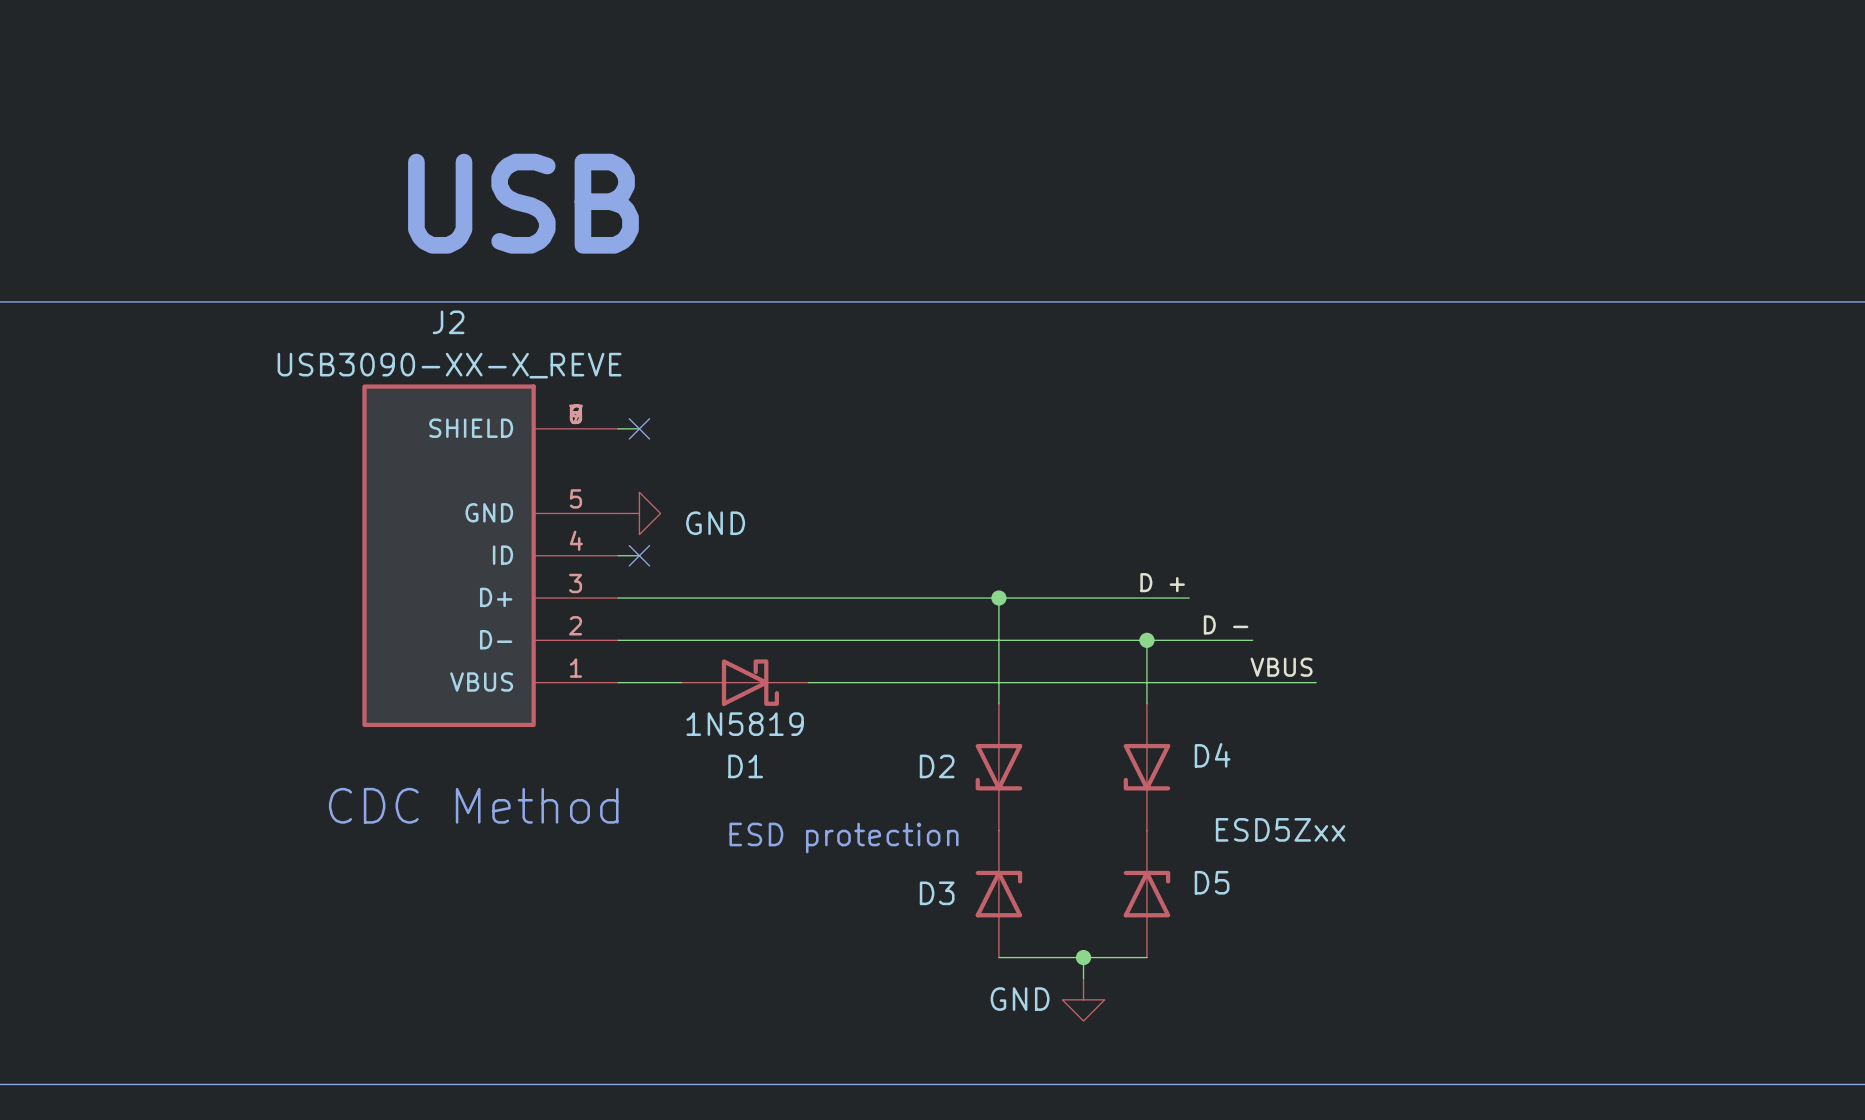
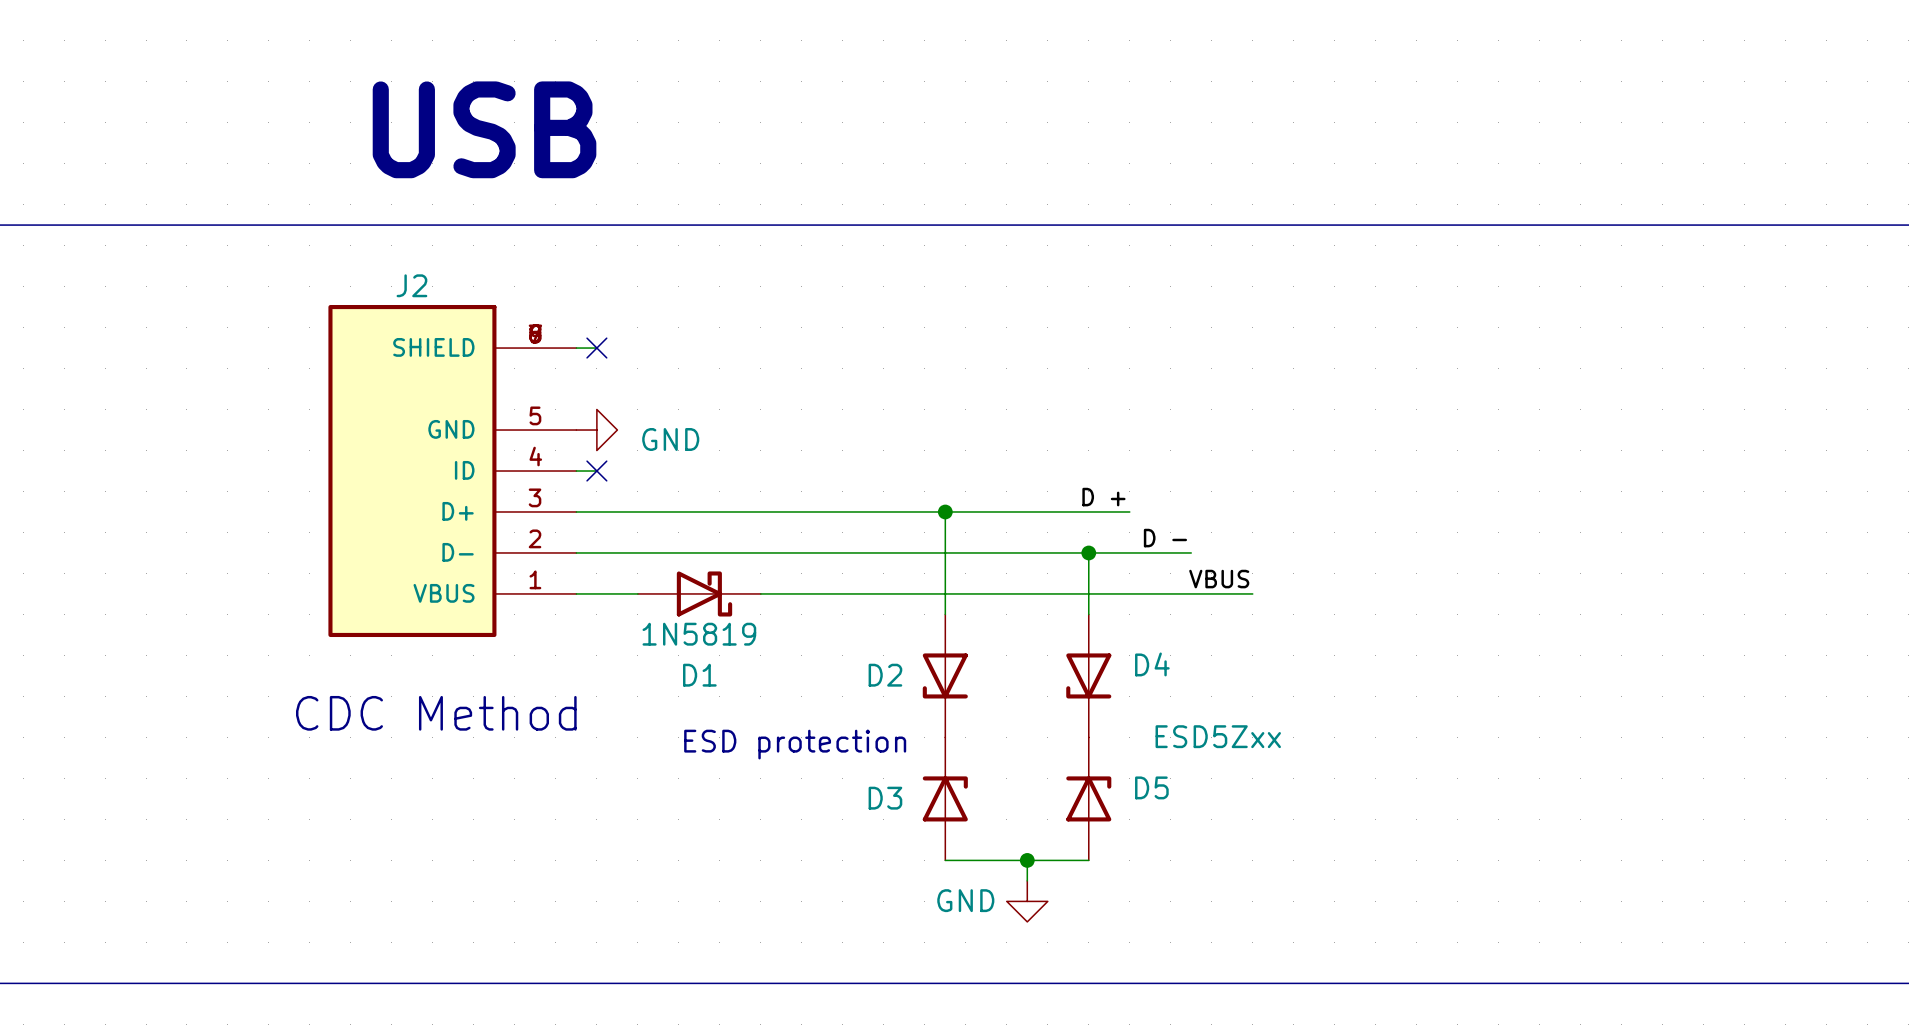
J2 name position: J2 (448, 322) -> J2 (411, 285)
J2 value: USB3090-XX-X_REVE (449, 365) -> none

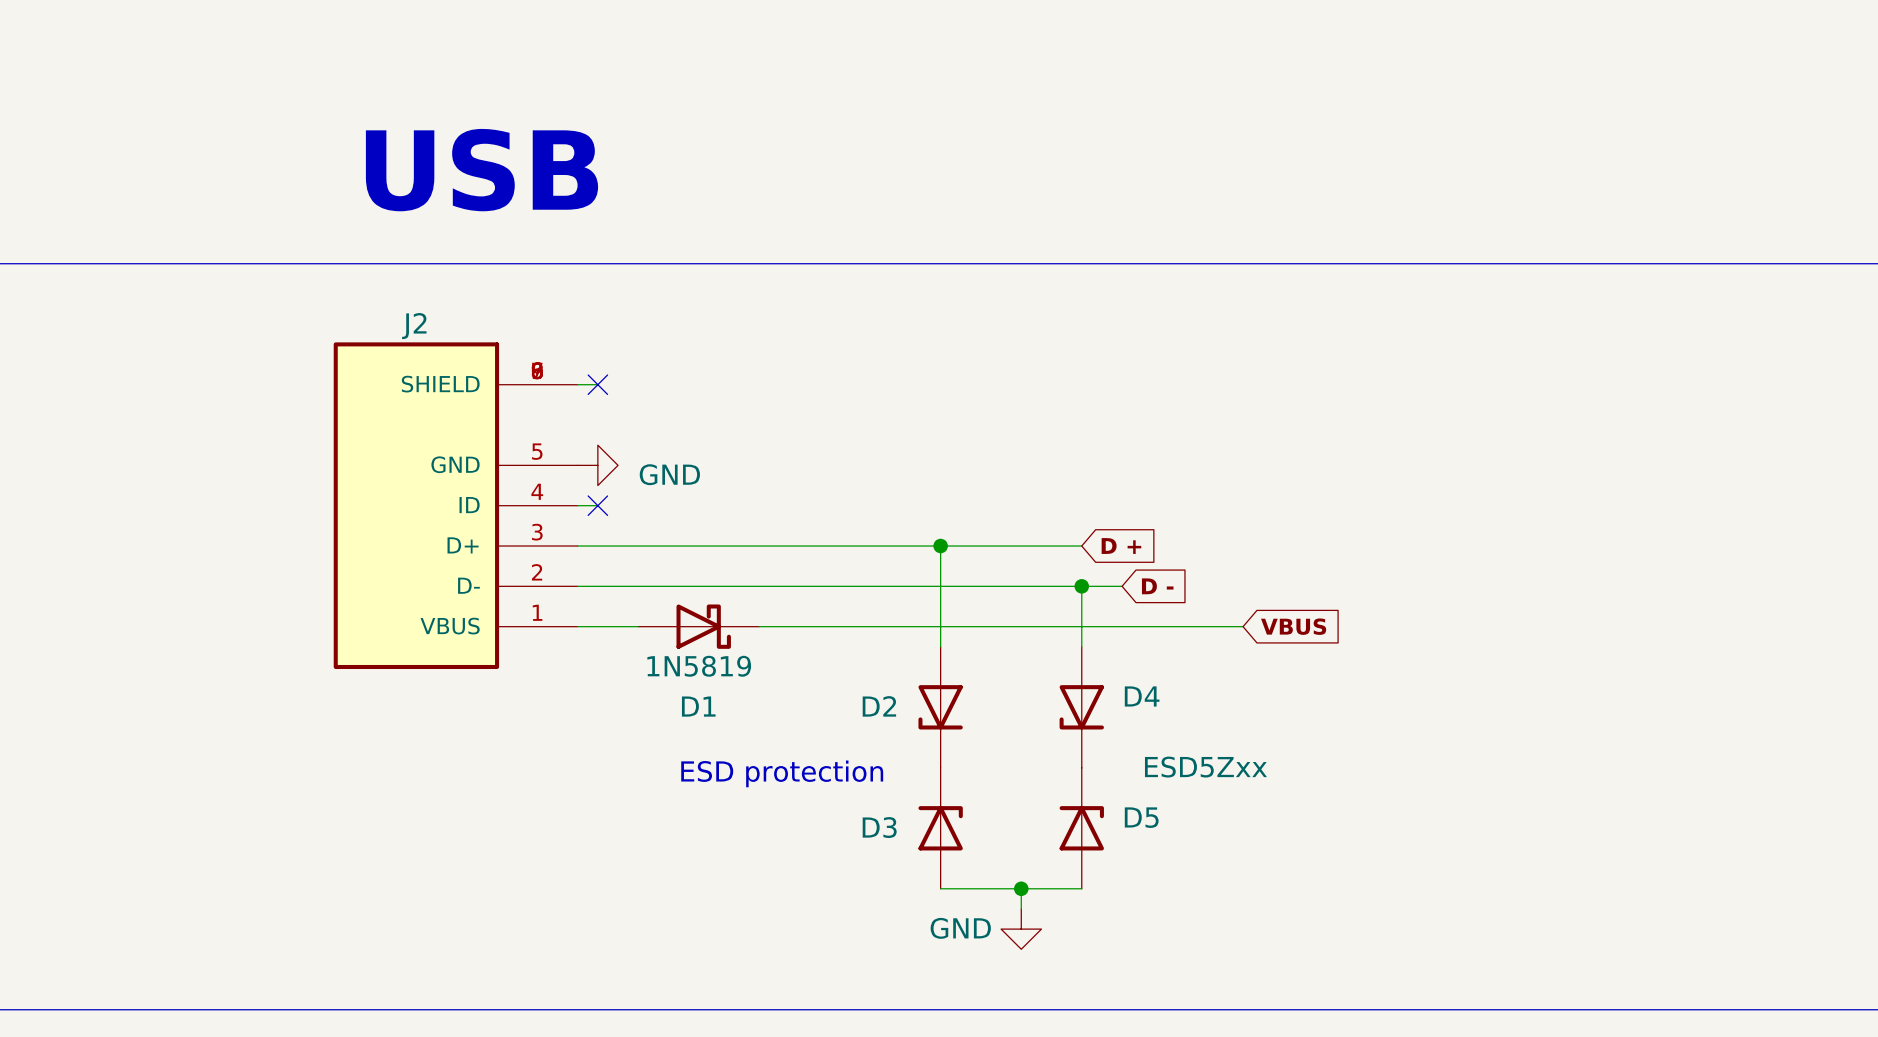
label: D + (1103, 497) -> none
wire: (1088, 511) (1129, 511) -> none
global label: none -> D + (1121, 546)
label: D - (1165, 538) -> none
wire: (1129, 552) (1191, 552) -> none
global label: none -> D - (1157, 586)
label: VBUS (1219, 579) -> none
global label: none -> VBUS (1293, 626)
text: CDC Method (436, 713) -> none

